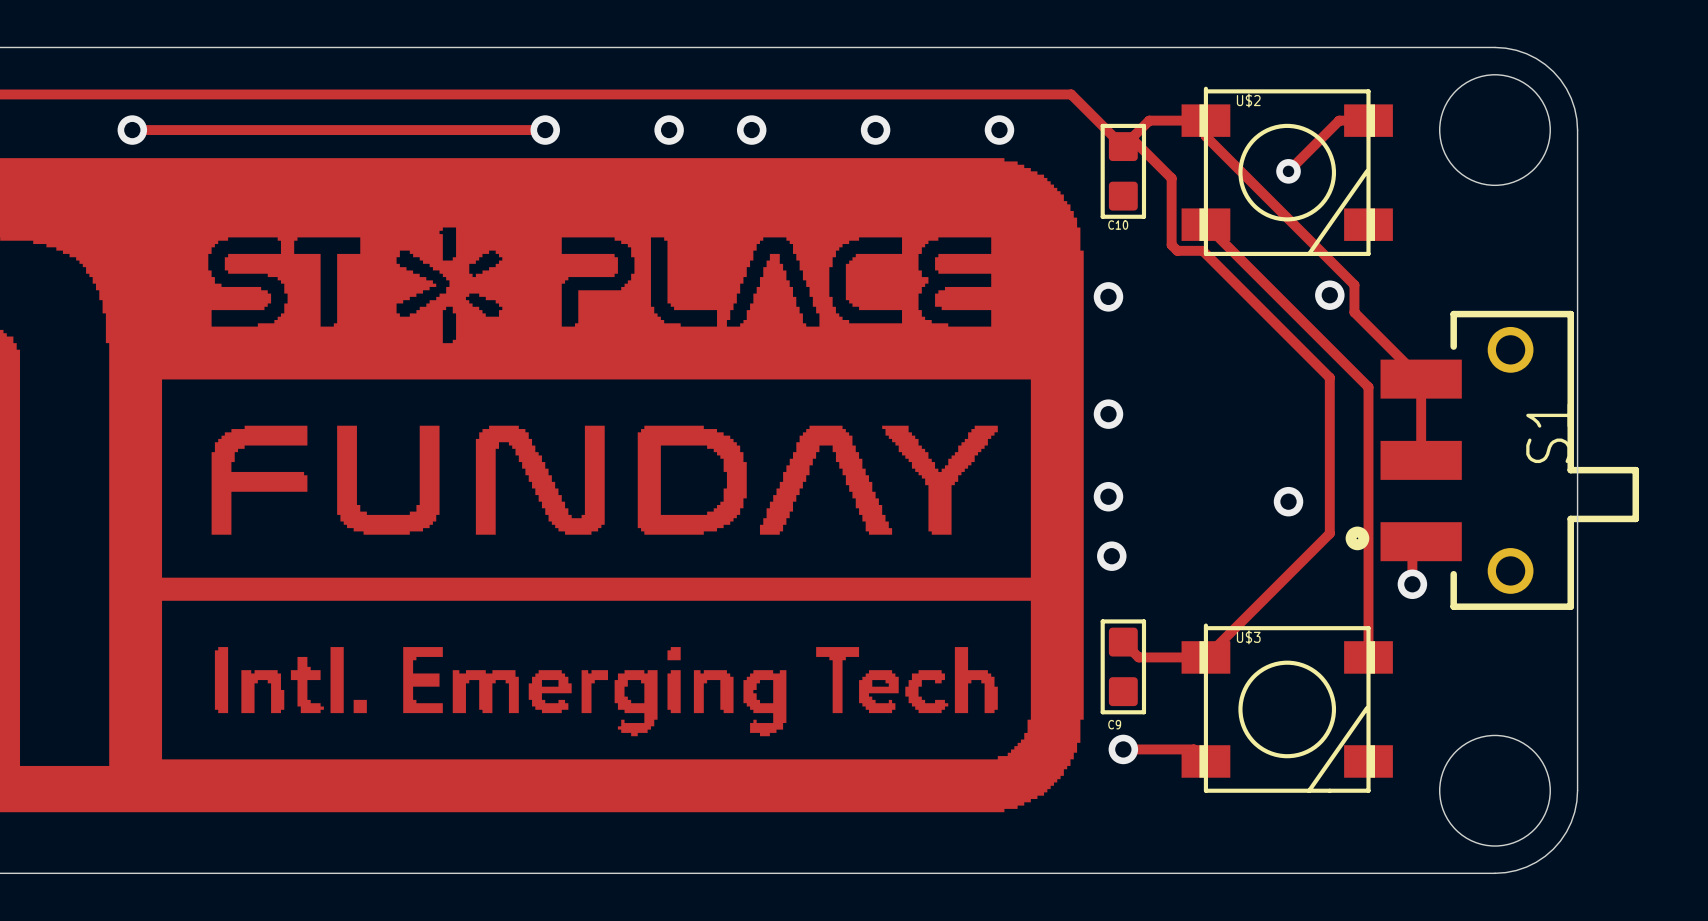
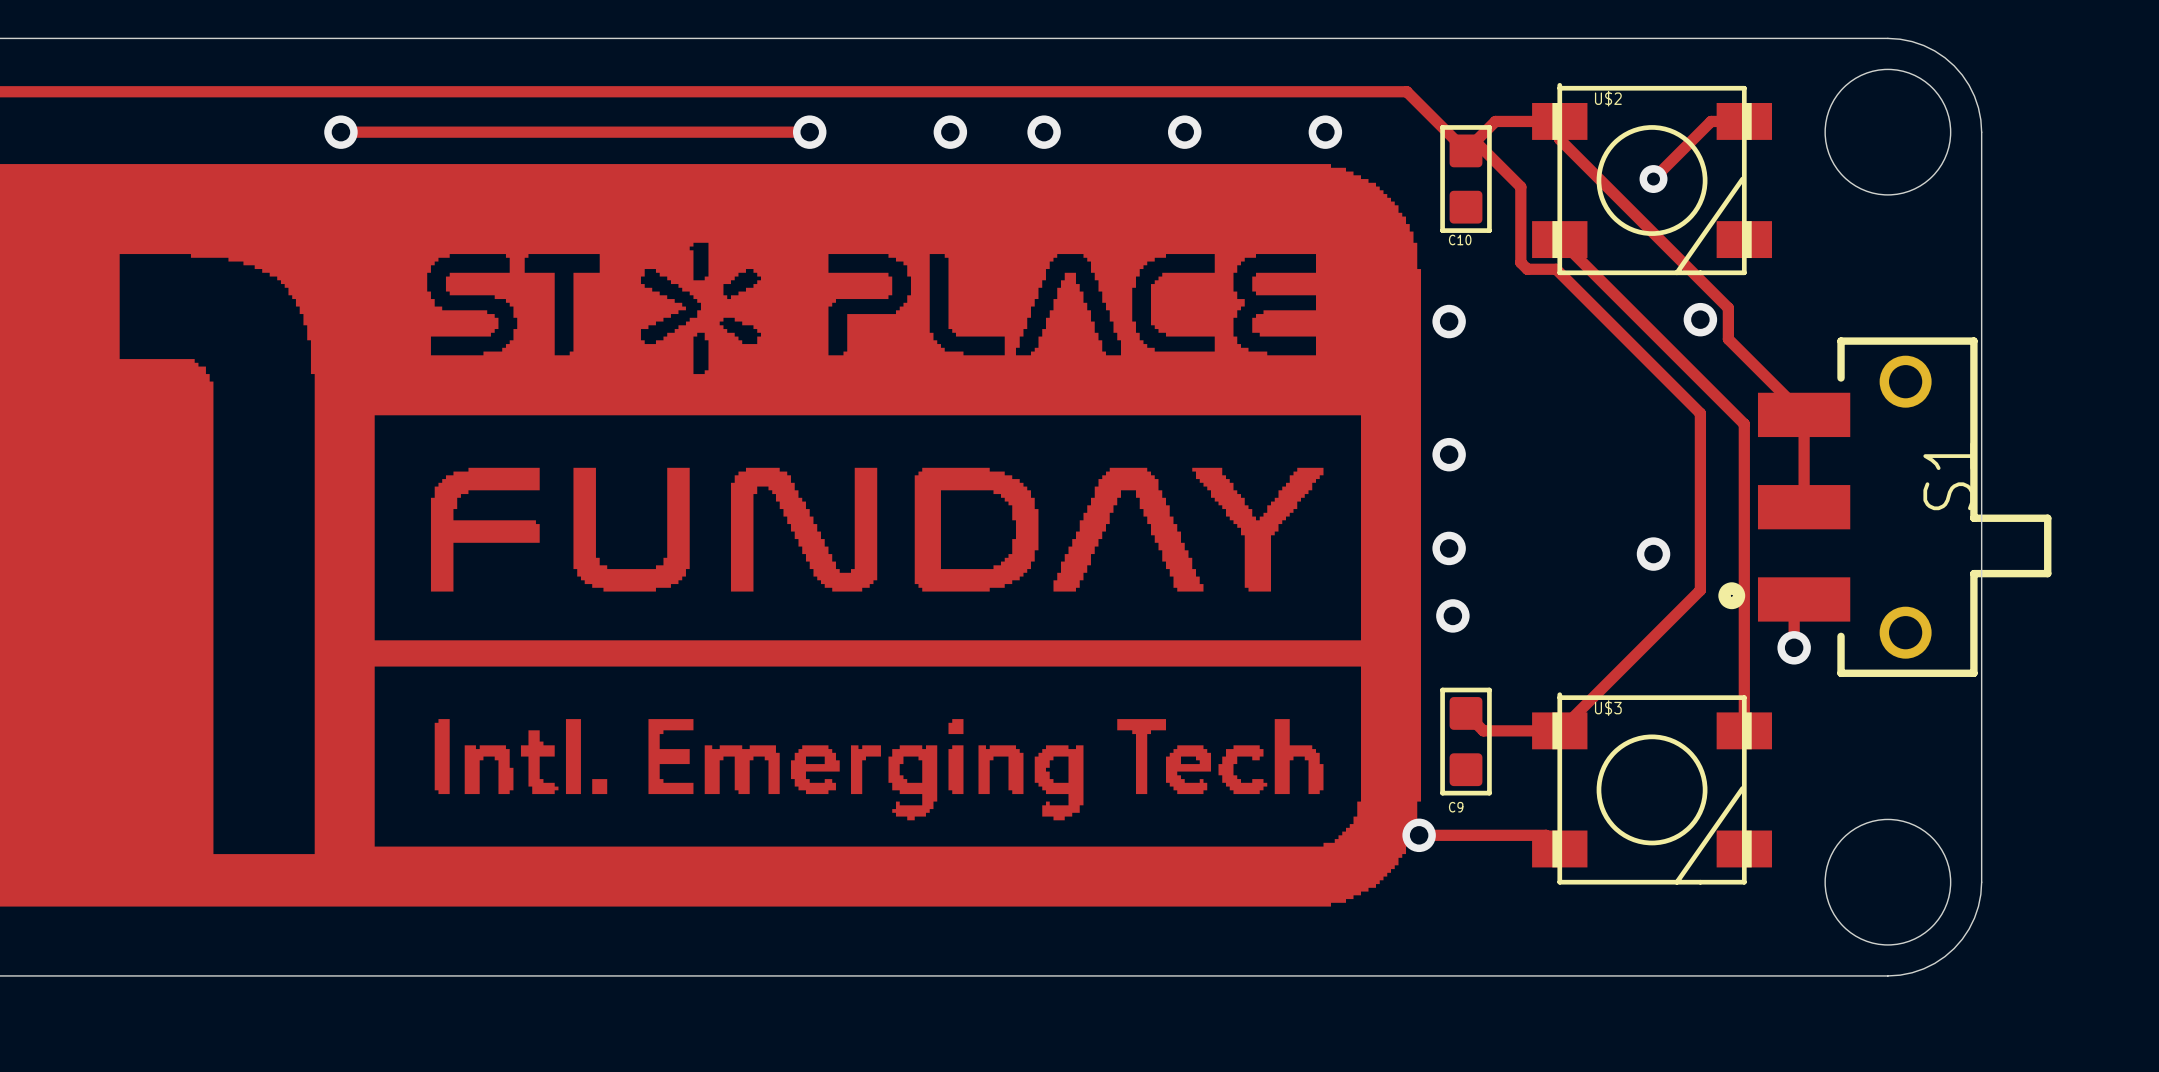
track: none -> (1419, 835) (1466, 835)
via position: (1123, 749) -> (1419, 835)

